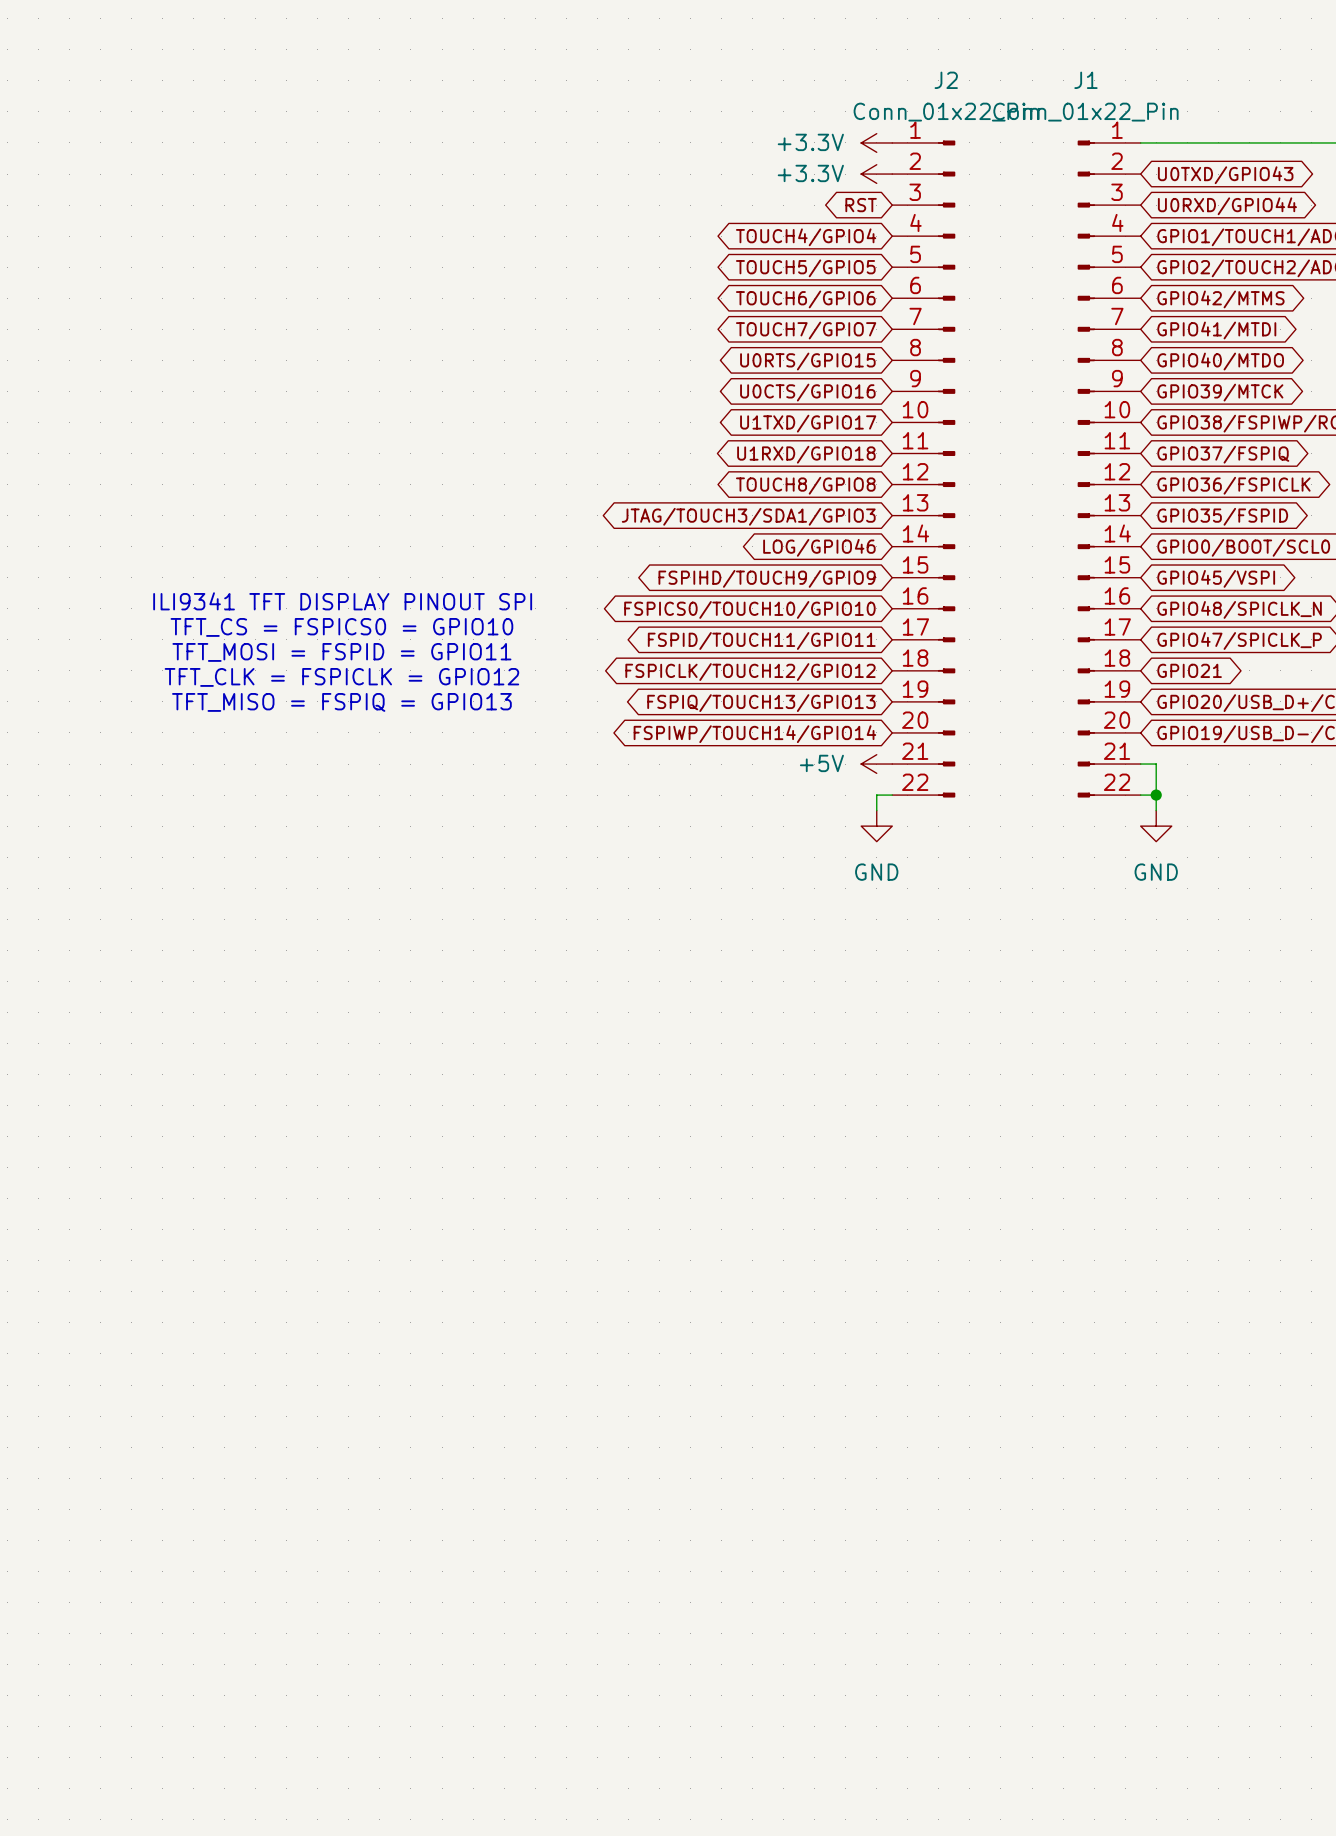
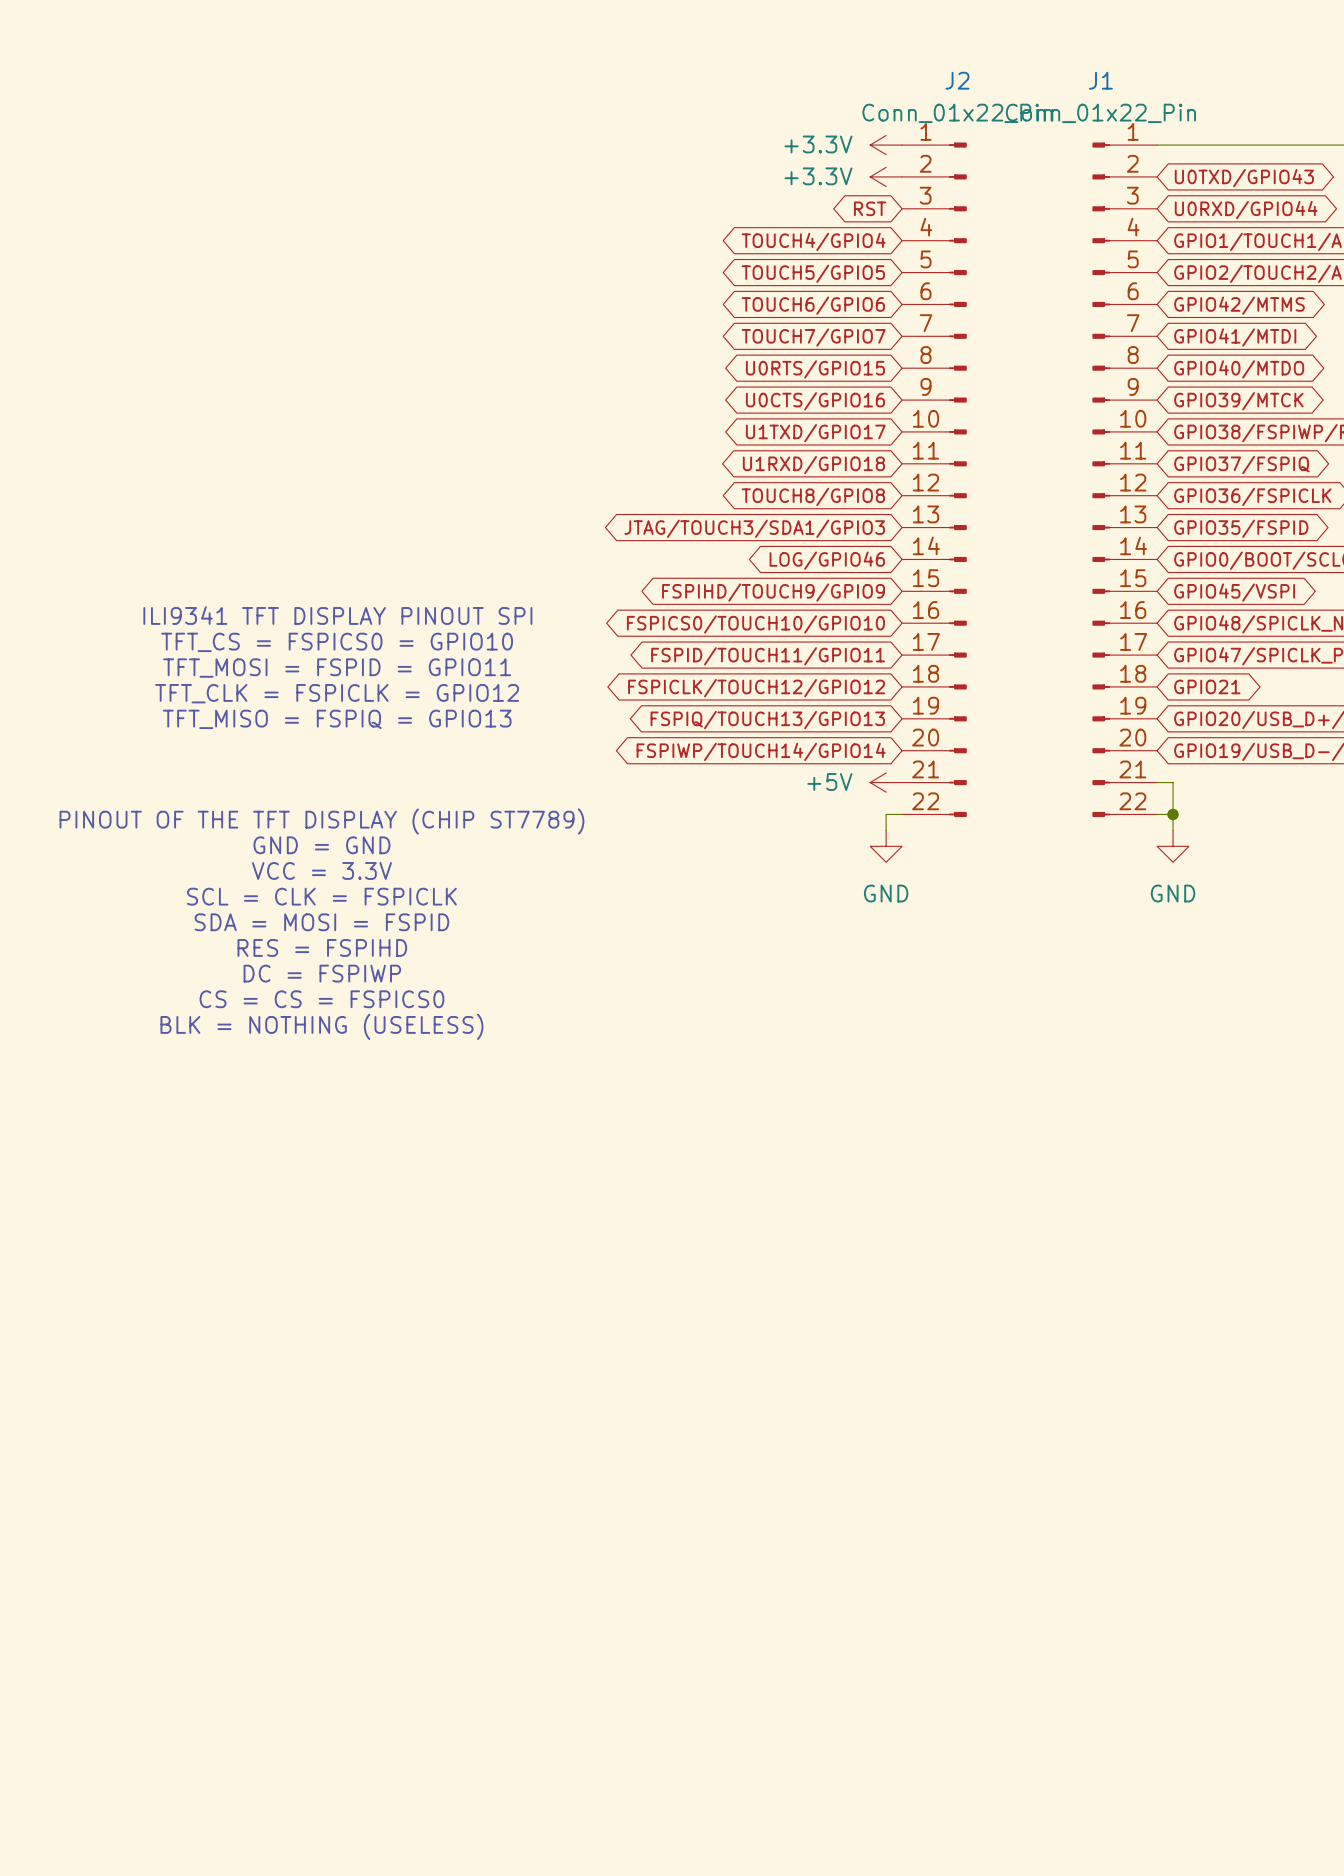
text: none -> PINOUT OF THE TFT DISPLAY (CHIP ST7789) (321, 821)
text: none -> GND = GND (321, 845)
text: none -> VCC = 3.3V (321, 870)
text: none -> SCL = CLK = FSPICLK (321, 896)
text: none -> SDA = MOSI = FSPID (321, 922)
text: none -> RES = FSPIHD (322, 947)
text: none -> DC = FSPIWP (322, 973)
text: none -> CS = CS = FSPICS0 (321, 999)
text: none -> BLK = NOTHING (USELESS) (321, 1026)

